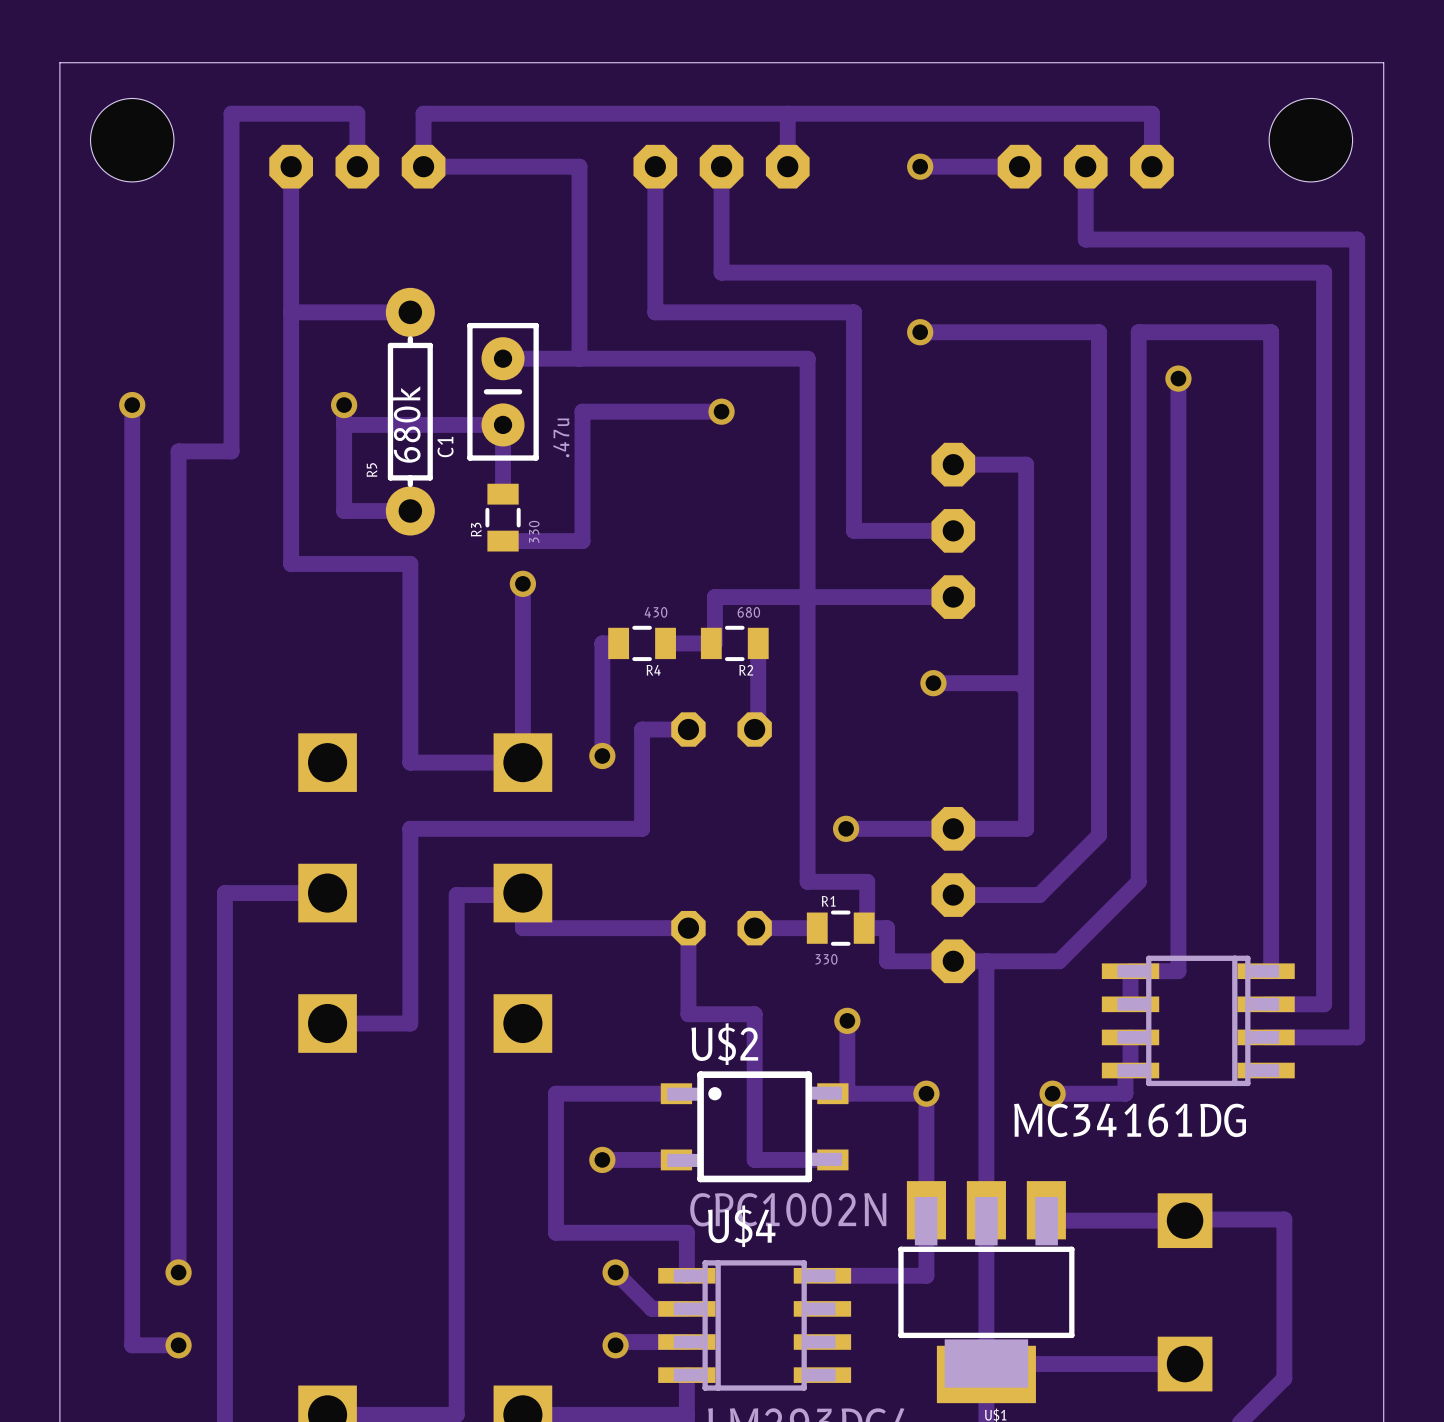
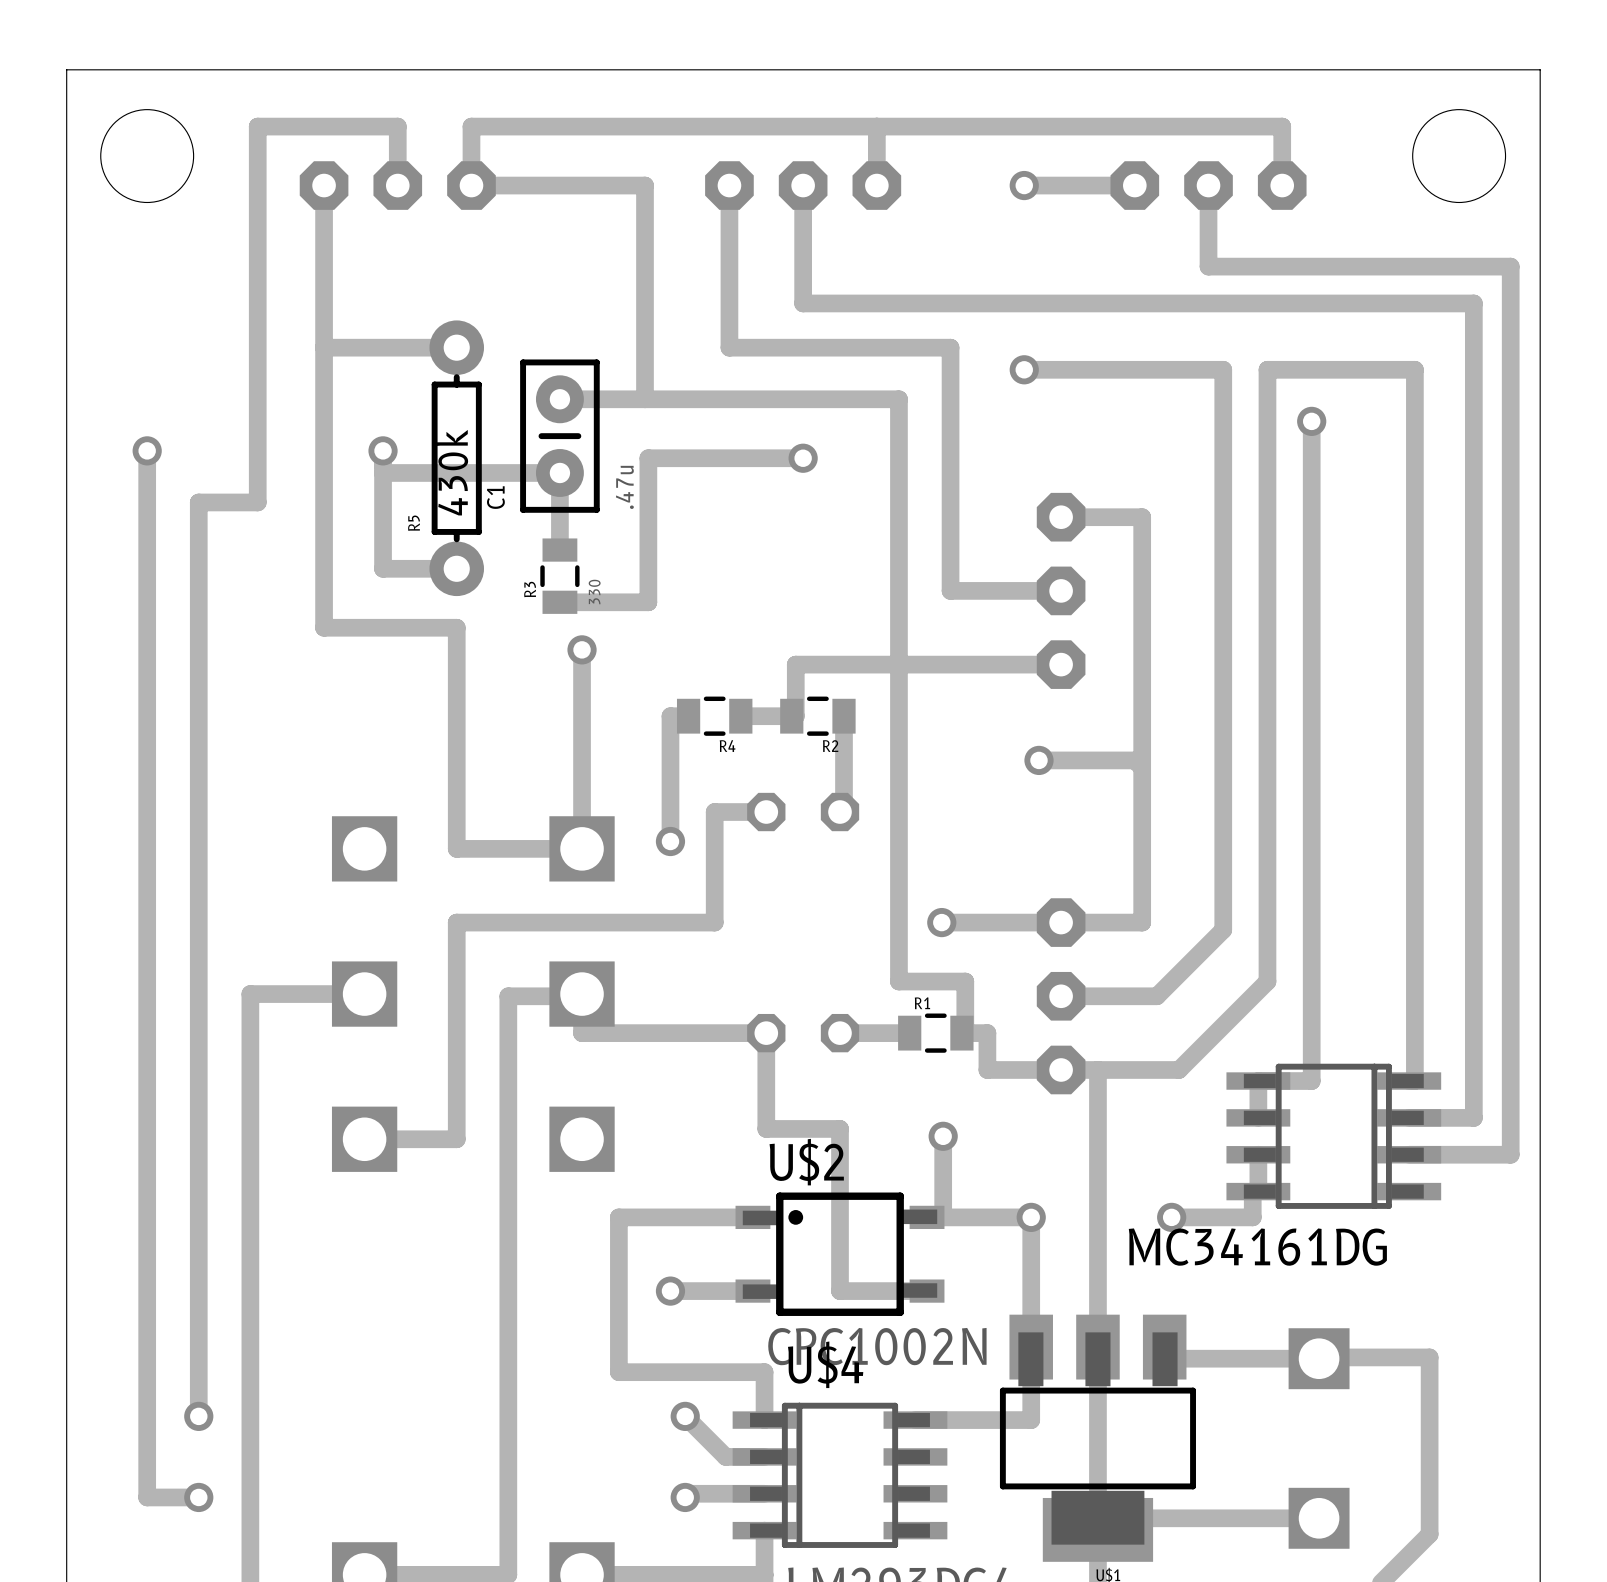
R5 value: 680k (406, 424) -> 430k (452, 472)
R4 value: 430 (656, 612) -> none
R2 value: 680 (748, 612) -> none
R1 value: 330 (826, 959) -> none

